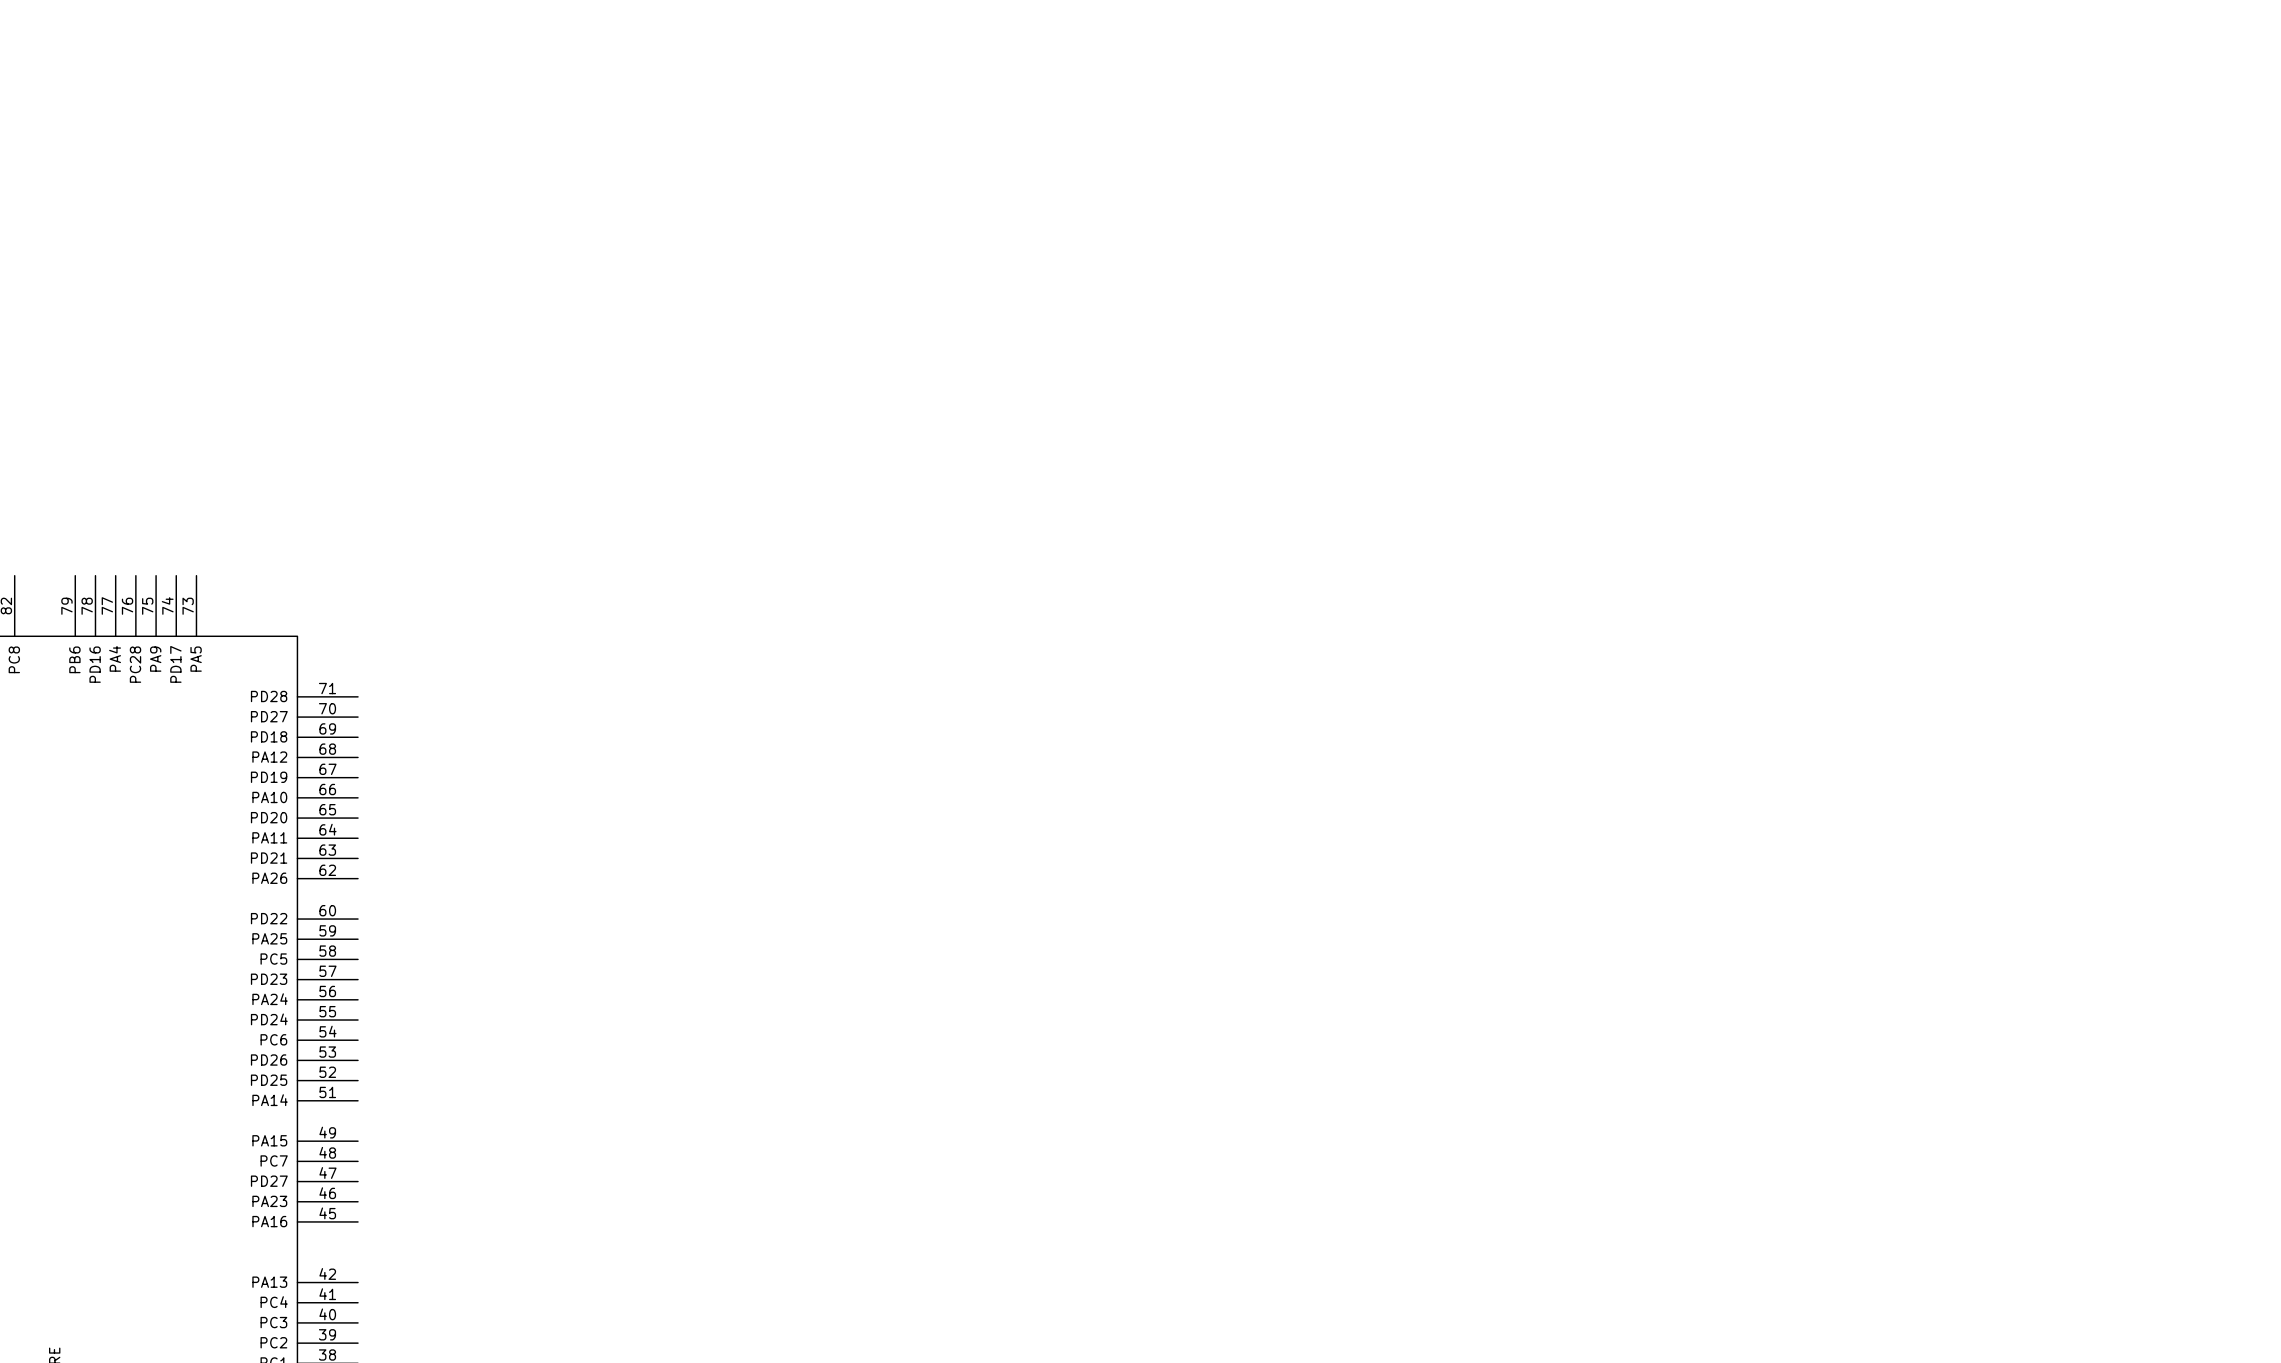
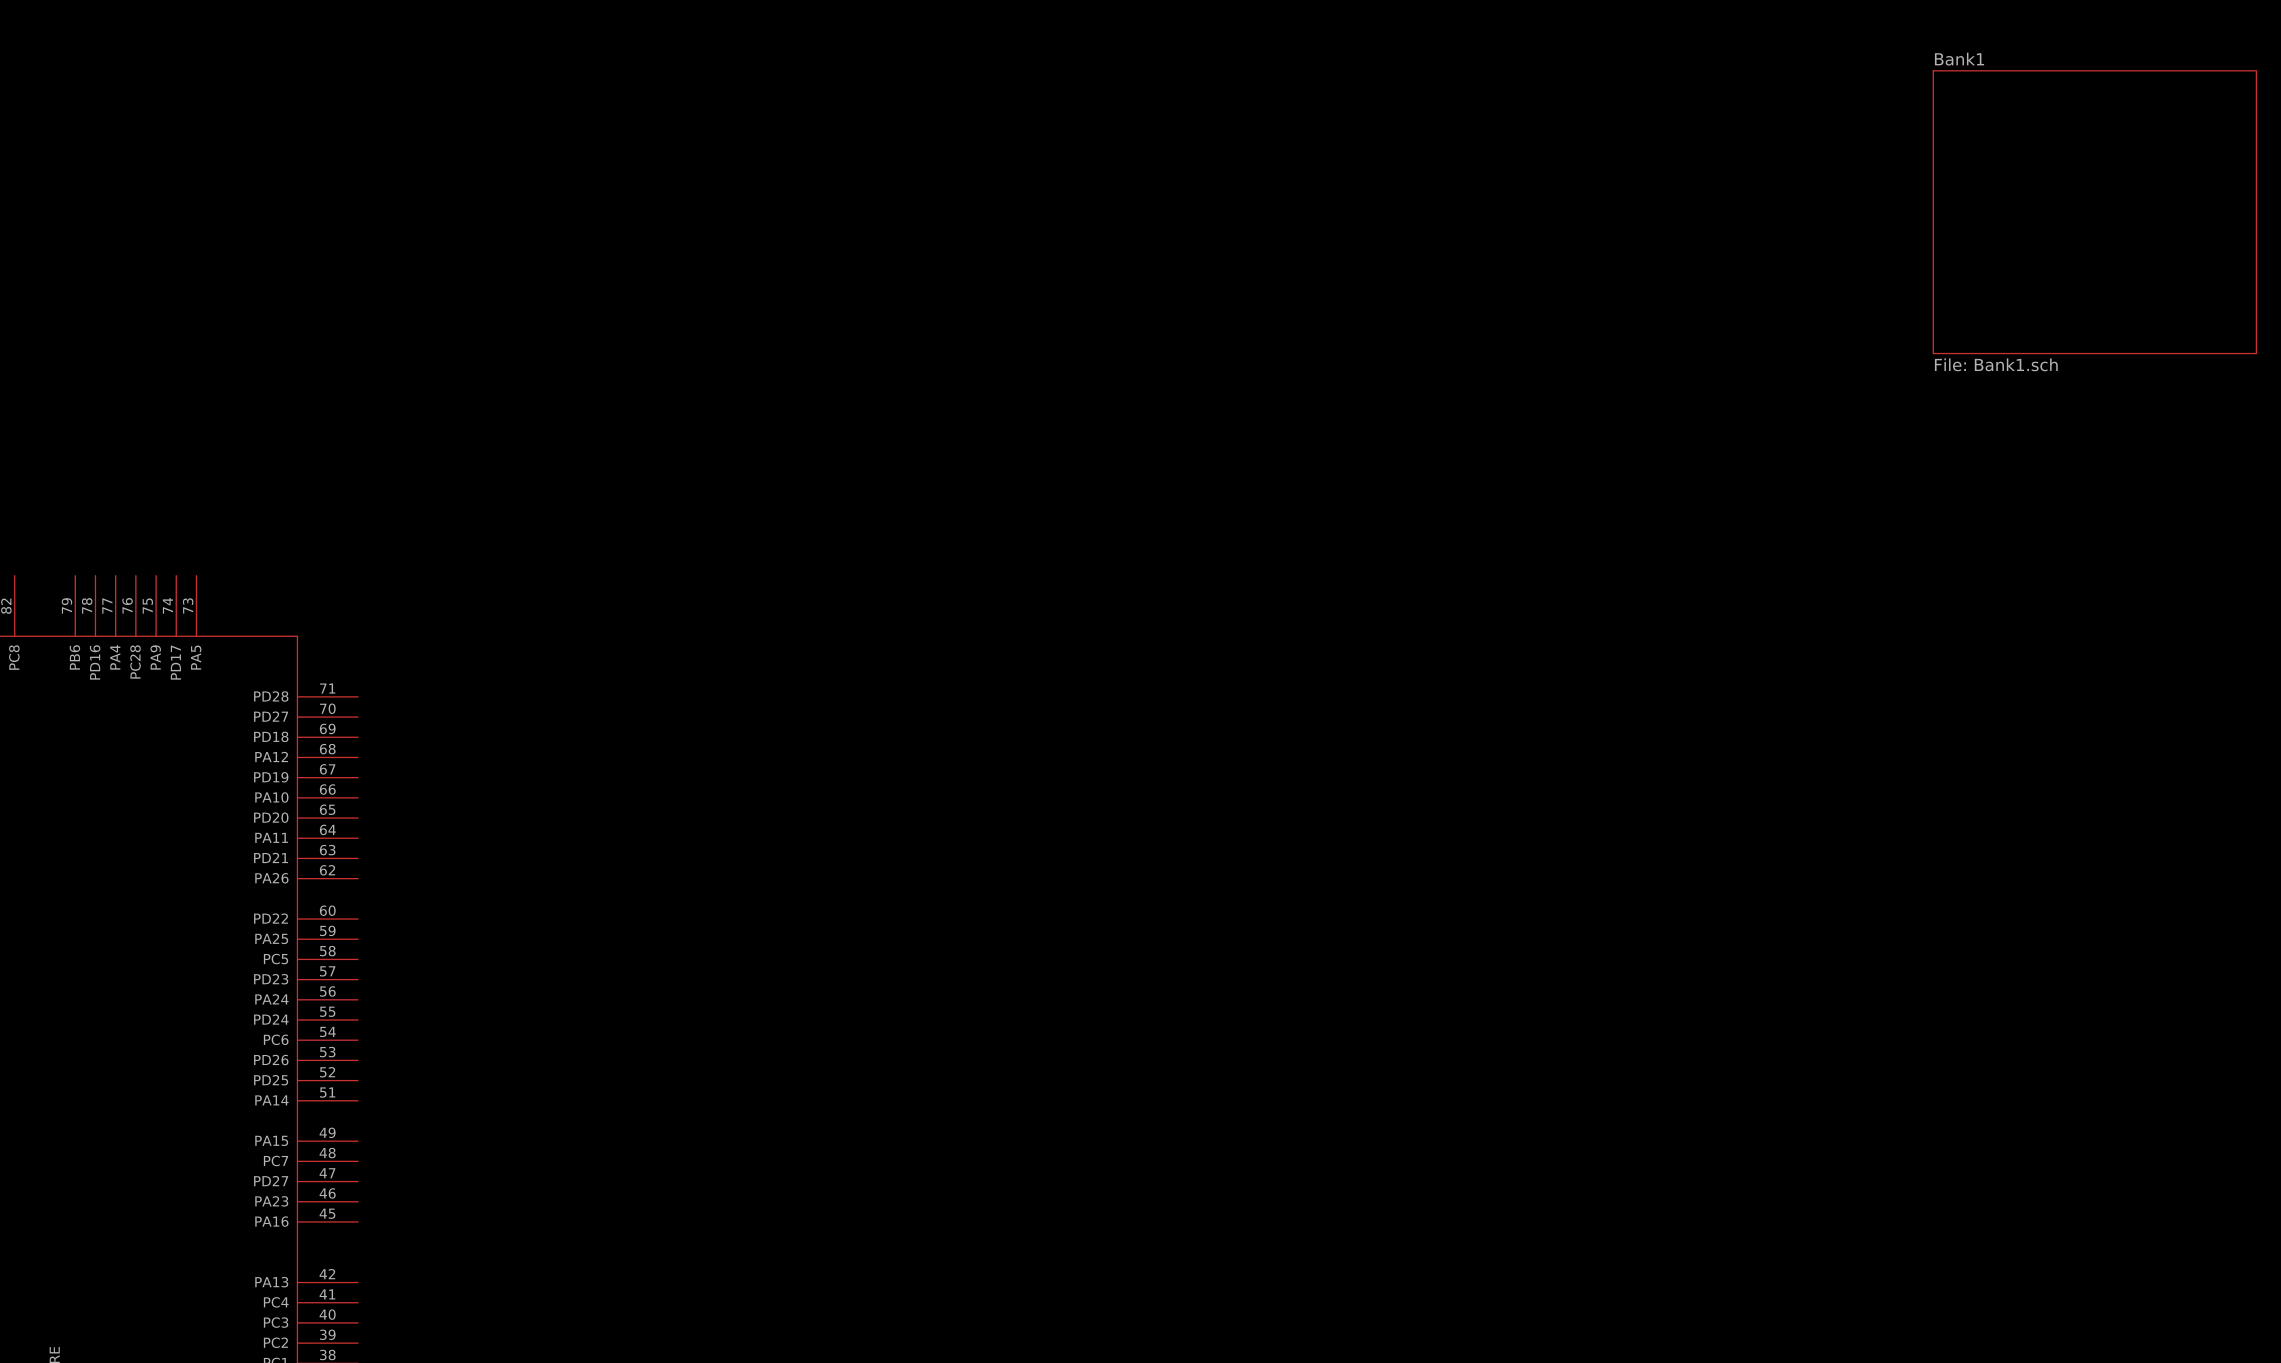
sheet Bank1: none -> File: Bank1.sch (2094, 212)

